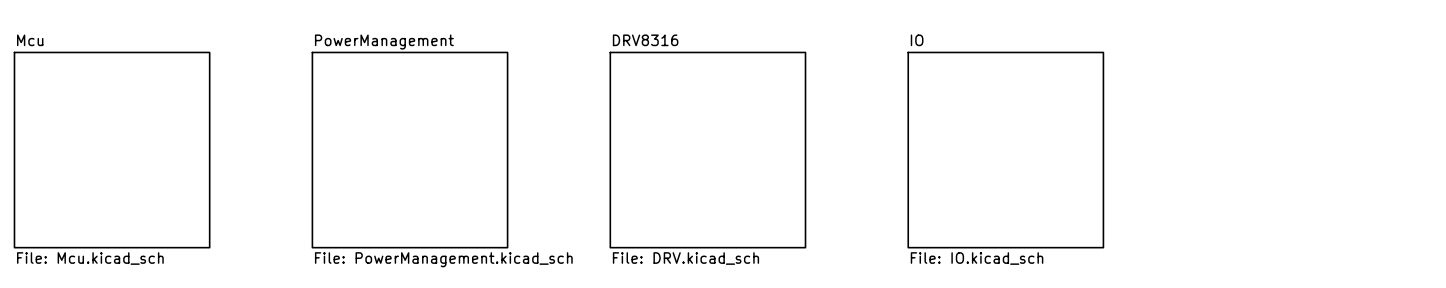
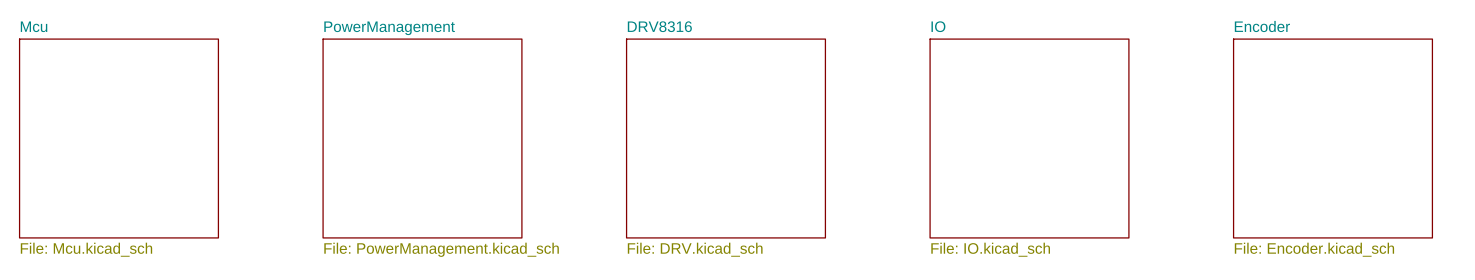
sheet Encoder: none -> File: Encoder.kicad_sch (1332, 138)

